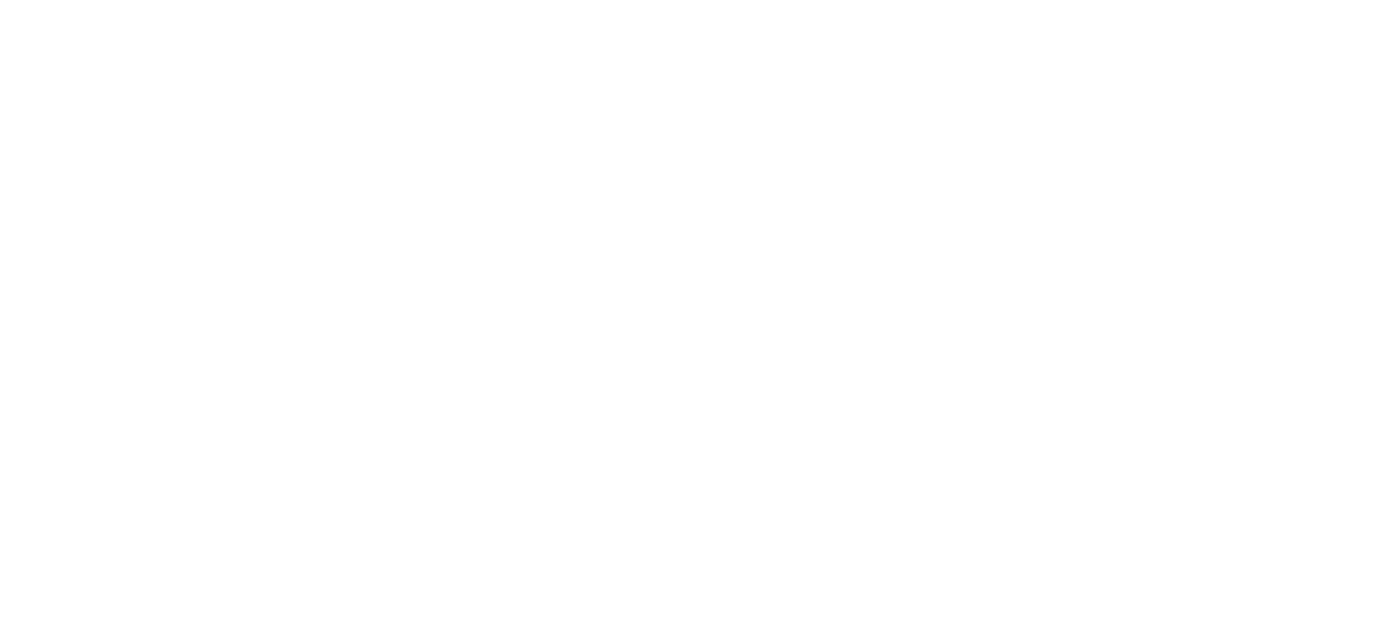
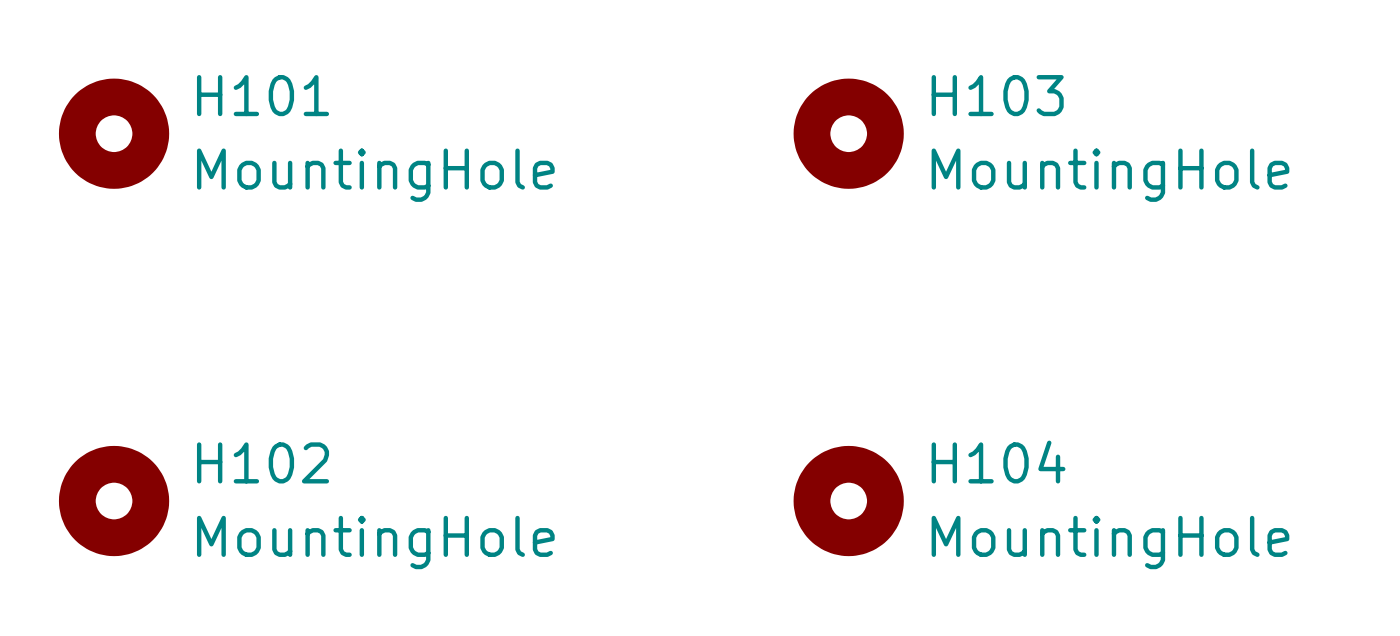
H101: none -> MountingHole (114, 133)
H103: none -> MountingHole (848, 133)
H102: none -> MountingHole (114, 501)
H104: none -> MountingHole (848, 501)

